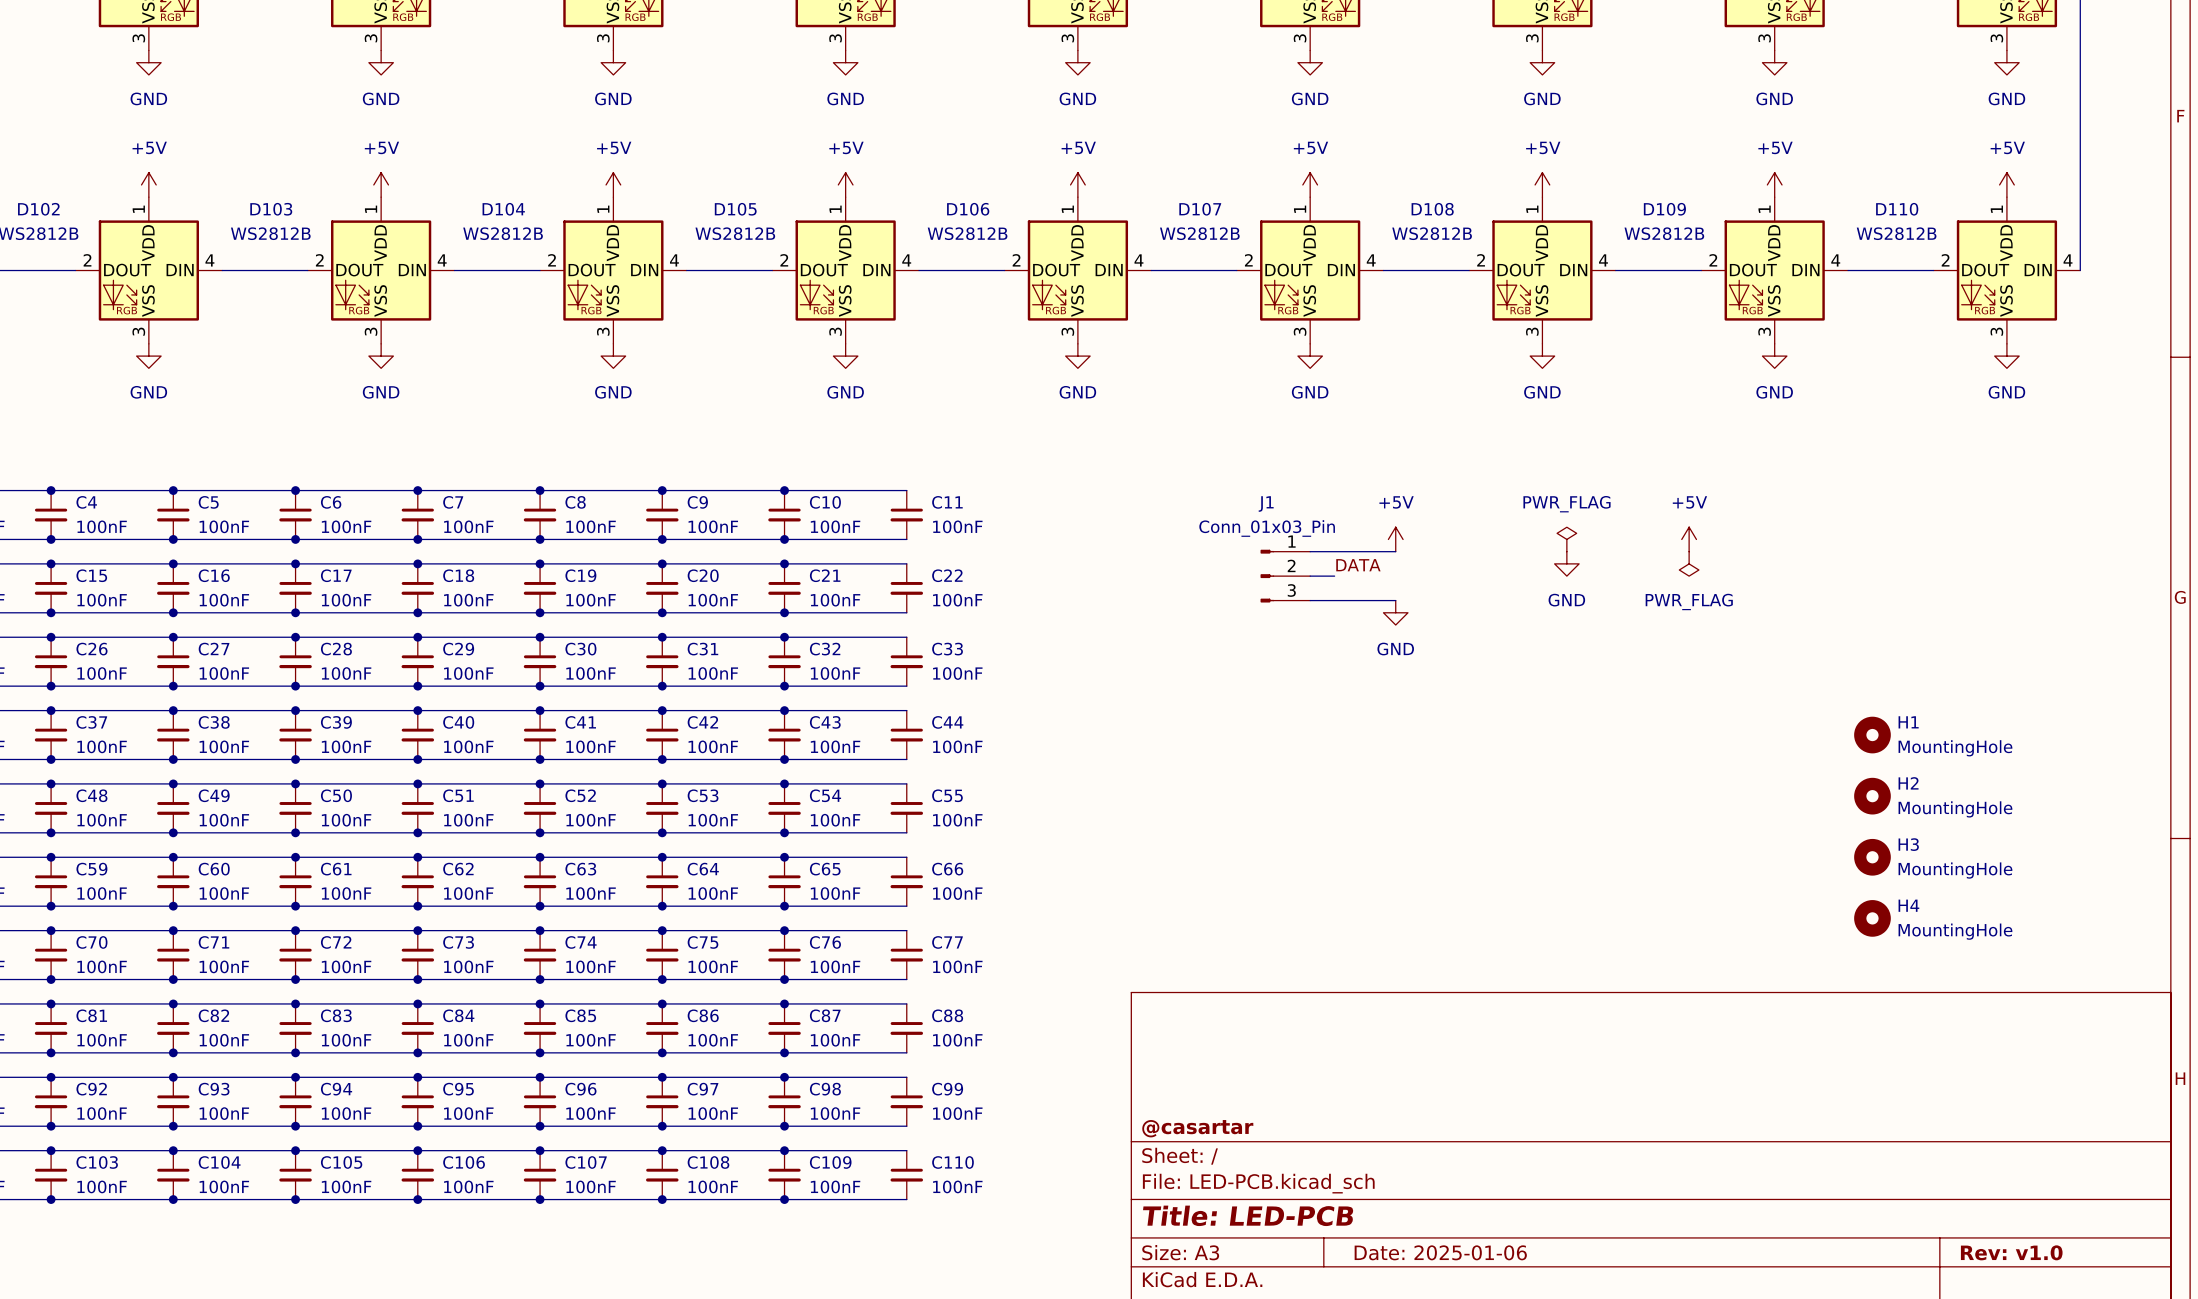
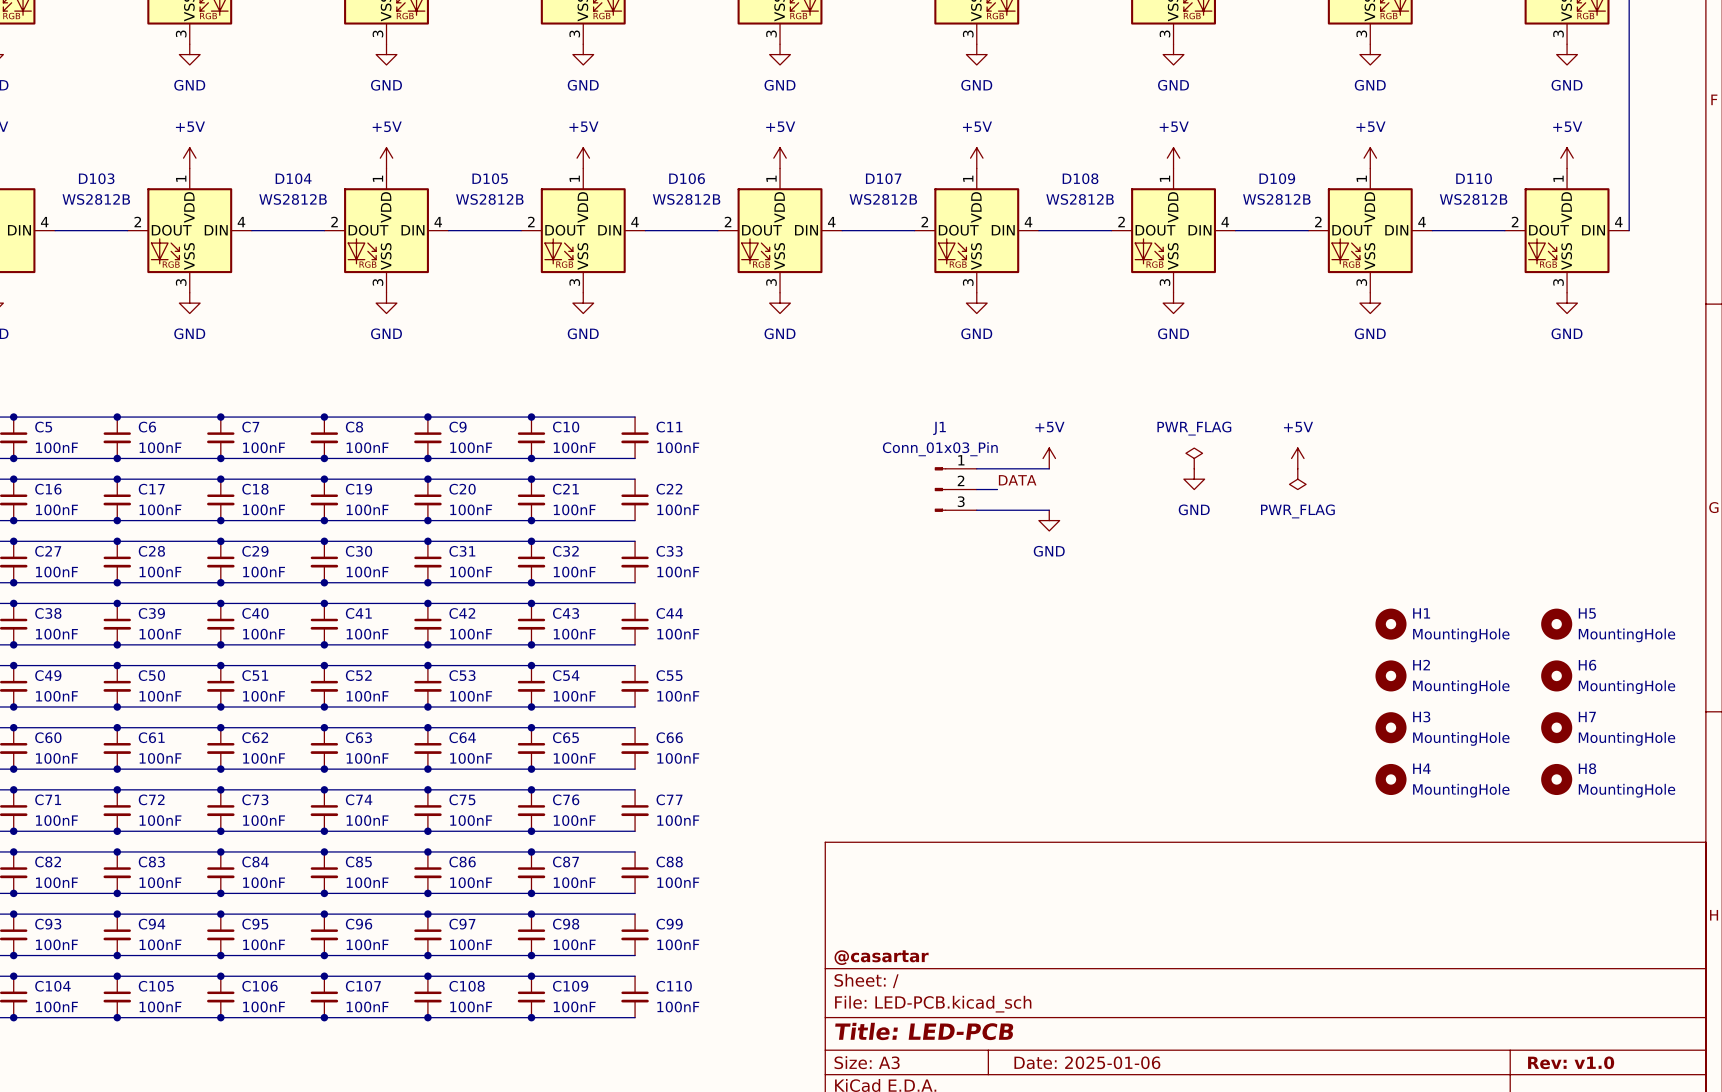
H1 position: (1872, 735) -> (1391, 624)
H5: none -> MountingHole (1556, 624)
H2 position: (1872, 796) -> (1391, 675)
H6: none -> MountingHole (1556, 675)
H3 position: (1872, 857) -> (1391, 727)
H7: none -> MountingHole (1556, 727)
H4 position: (1872, 918) -> (1391, 779)
H8: none -> MountingHole (1556, 779)

